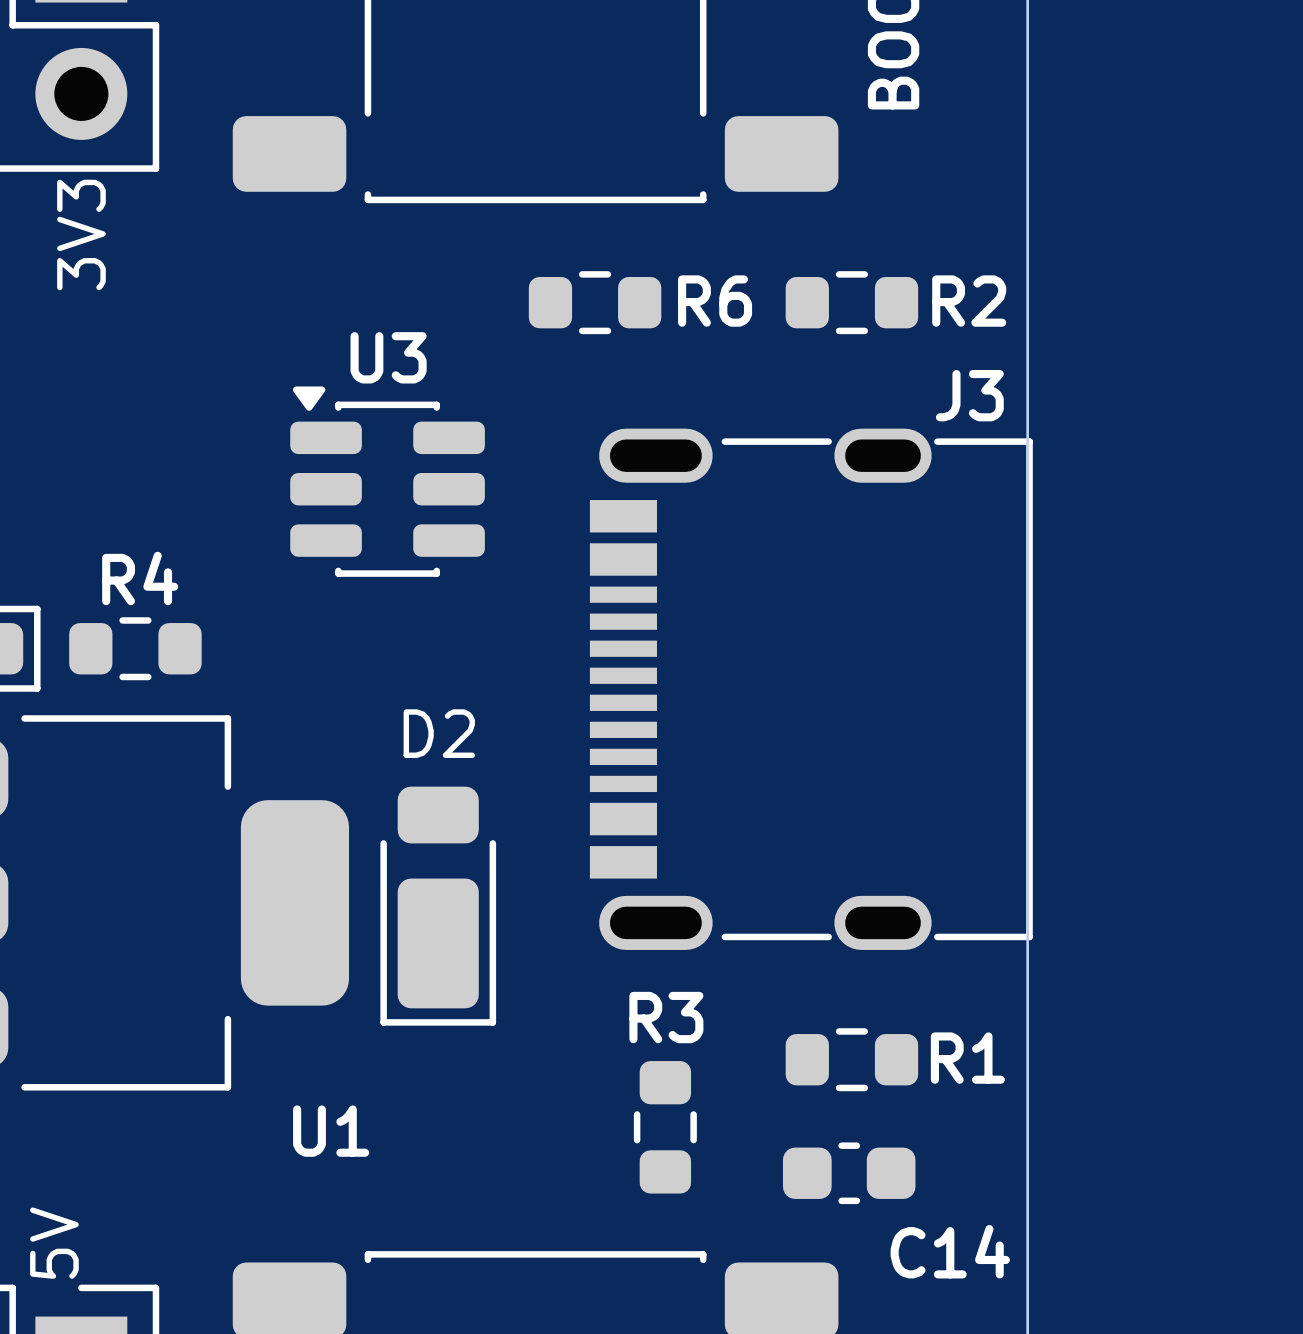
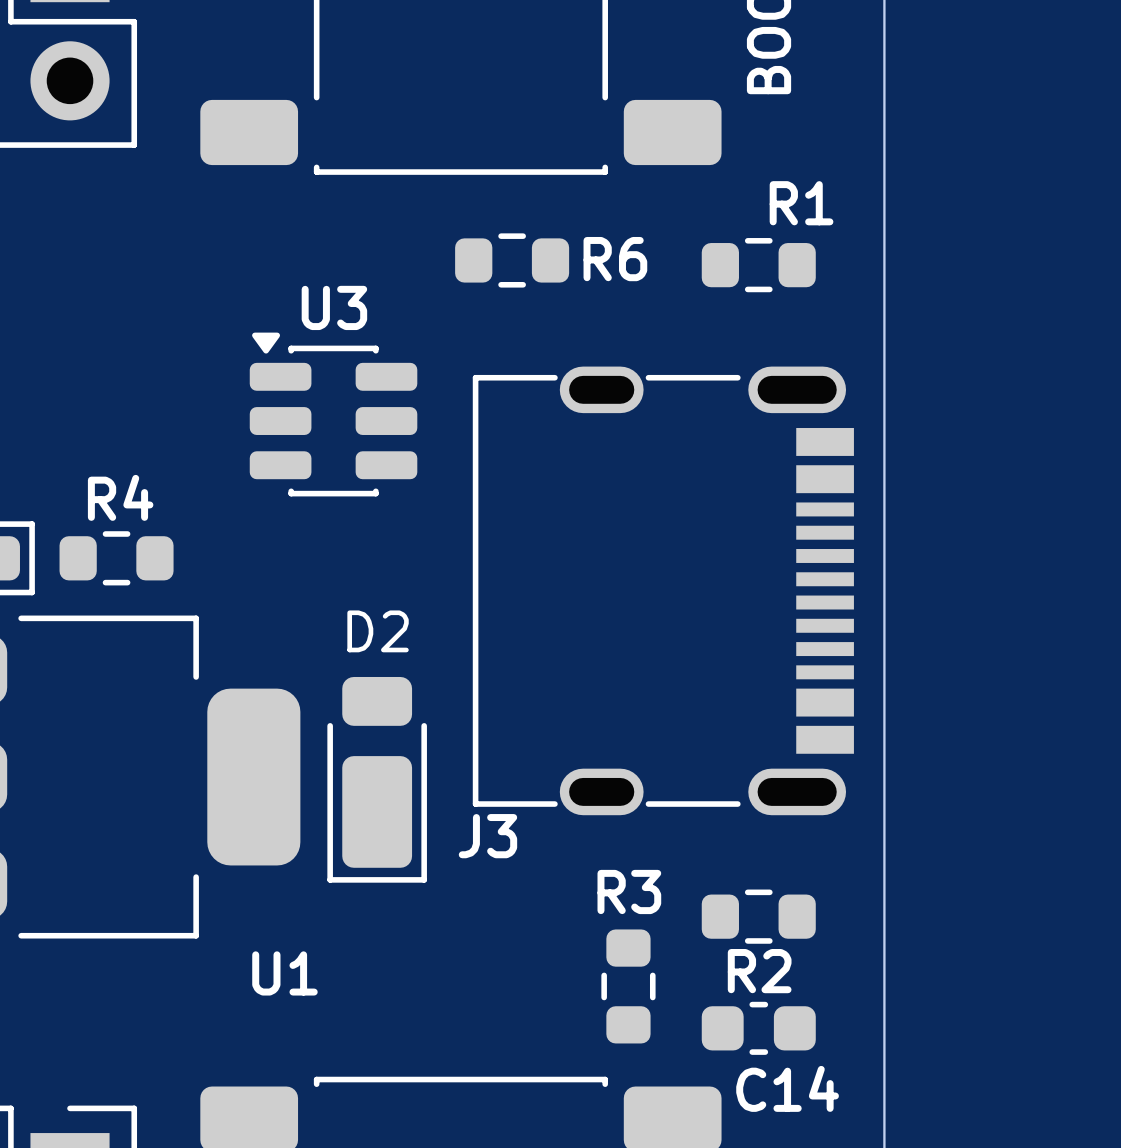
text: 3V3 (81, 234) -> none
R2 name position: R2 (969, 301) -> R2 (759, 971)
R2 position: (851, 302) -> (758, 916)
J3 rotation: 0° (811, 689) -> 180° (663, 590)
R1 name position: R1 (967, 1058) -> R1 (801, 203)
R1 position: (851, 1059) -> (758, 265)
R3 position: (665, 1127) -> (628, 986)
C14 position: (849, 1173) -> (758, 1028)
text: 5V (54, 1243) -> none
C14 name position: C14 (950, 1251) -> C14 (787, 1088)

